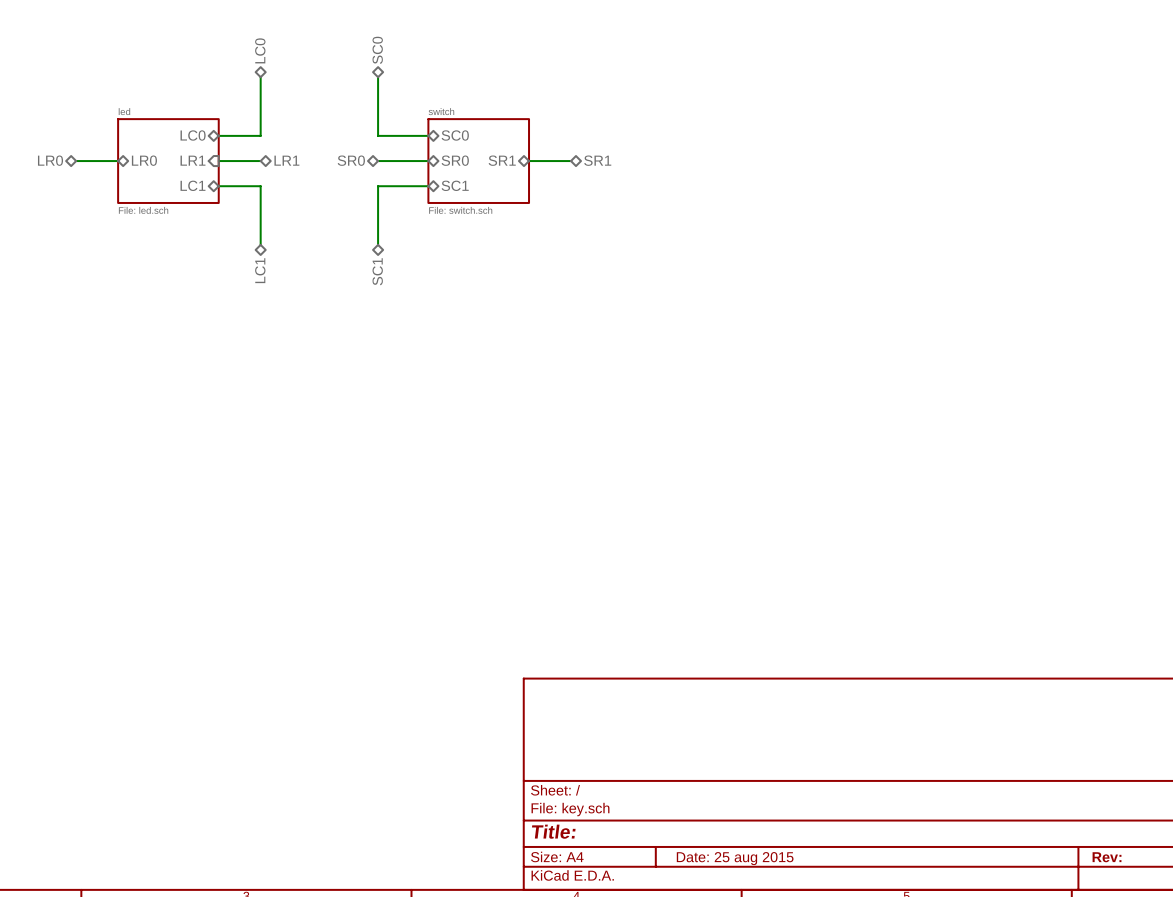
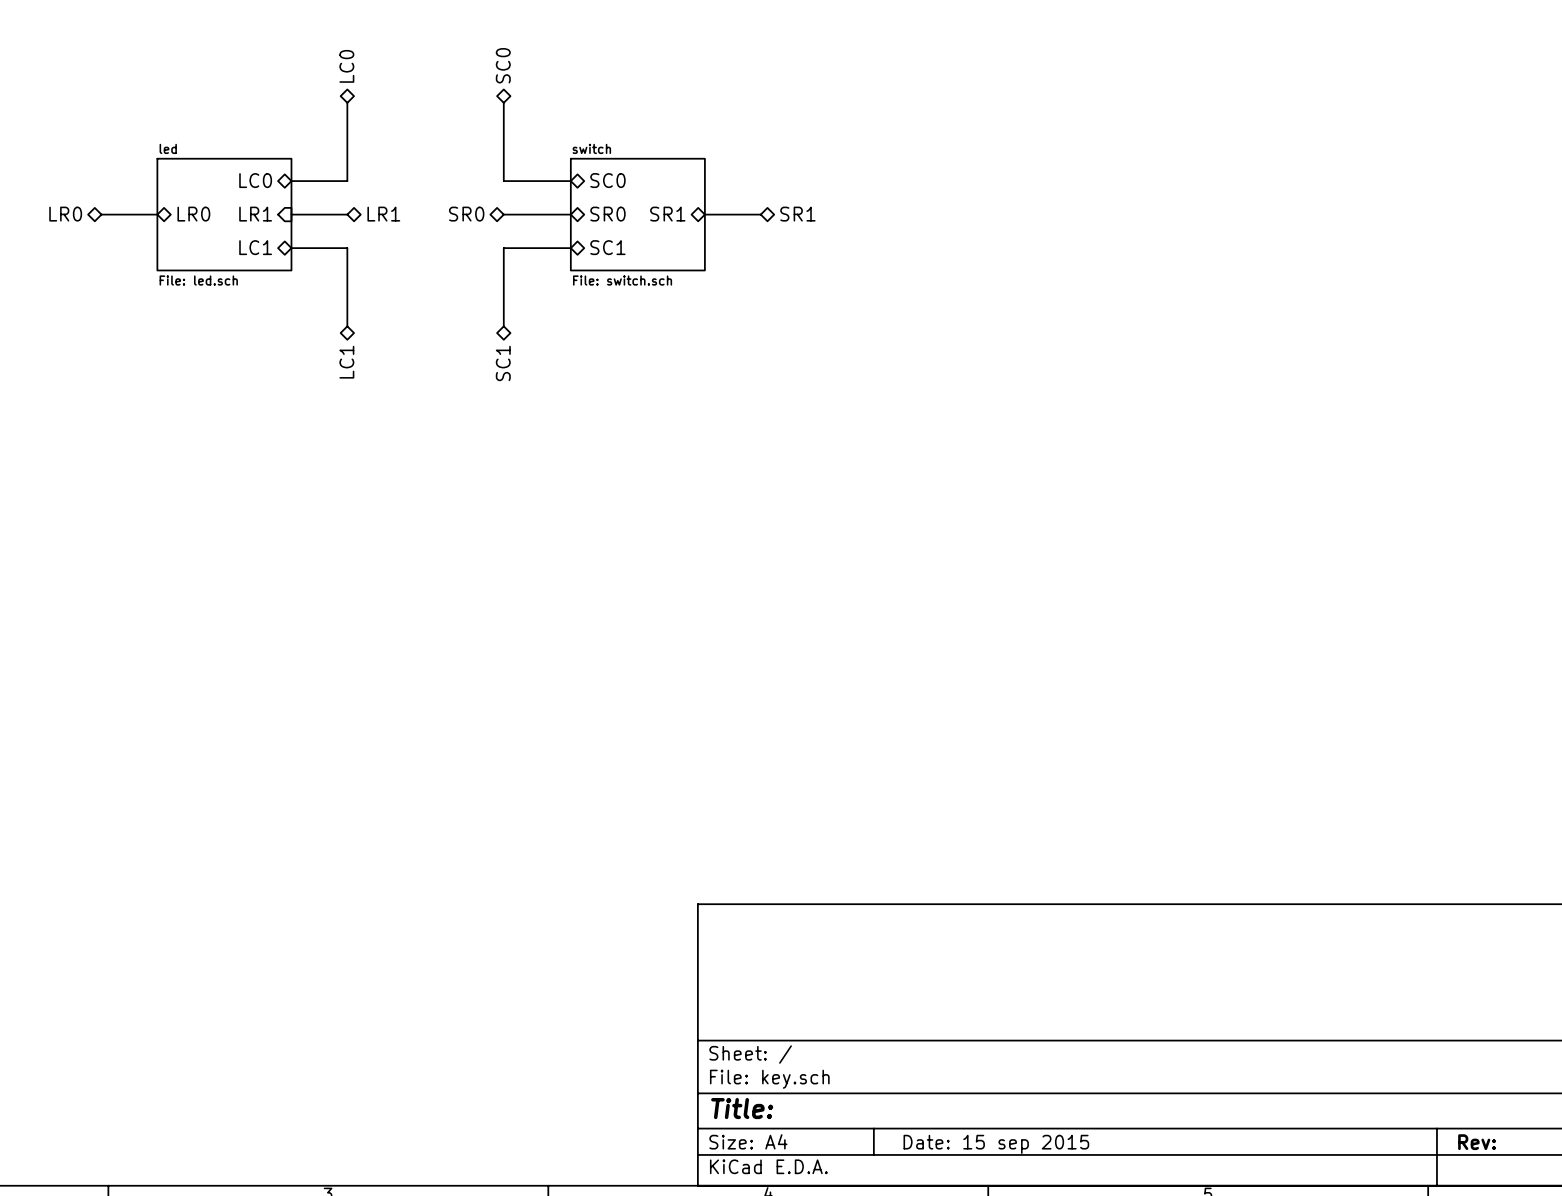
title block: Date: 25 aug 2015 (735, 858) -> Date: 15 sep 2015 (996, 1144)

